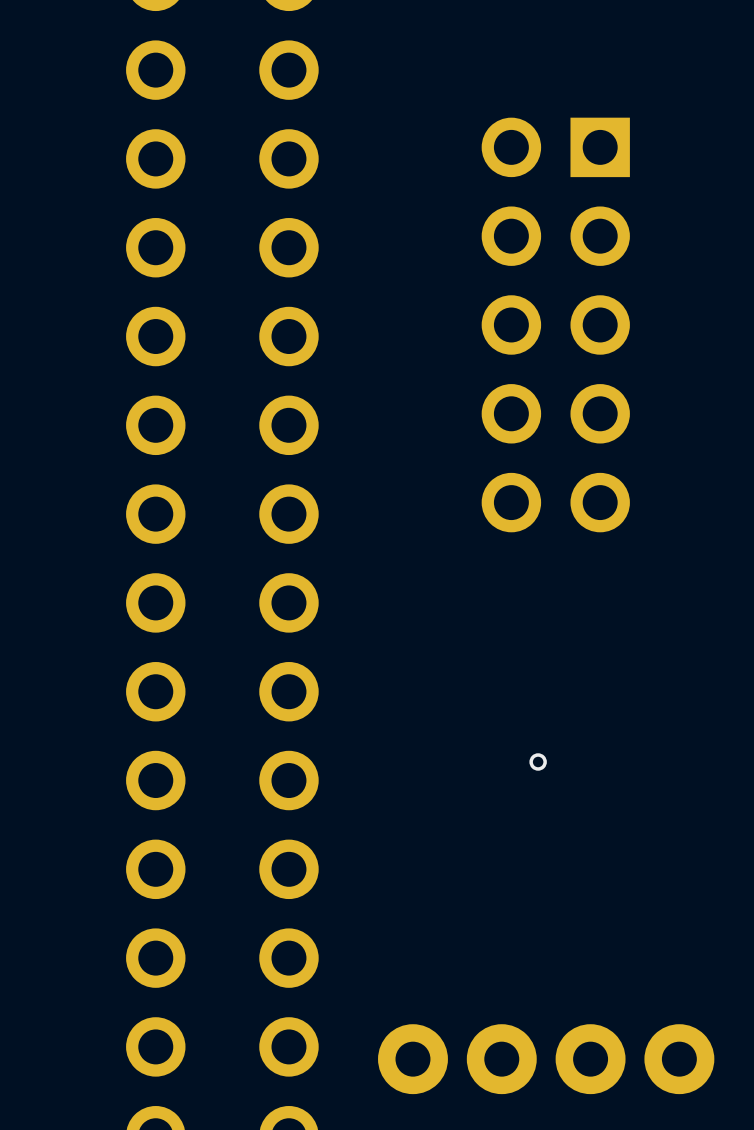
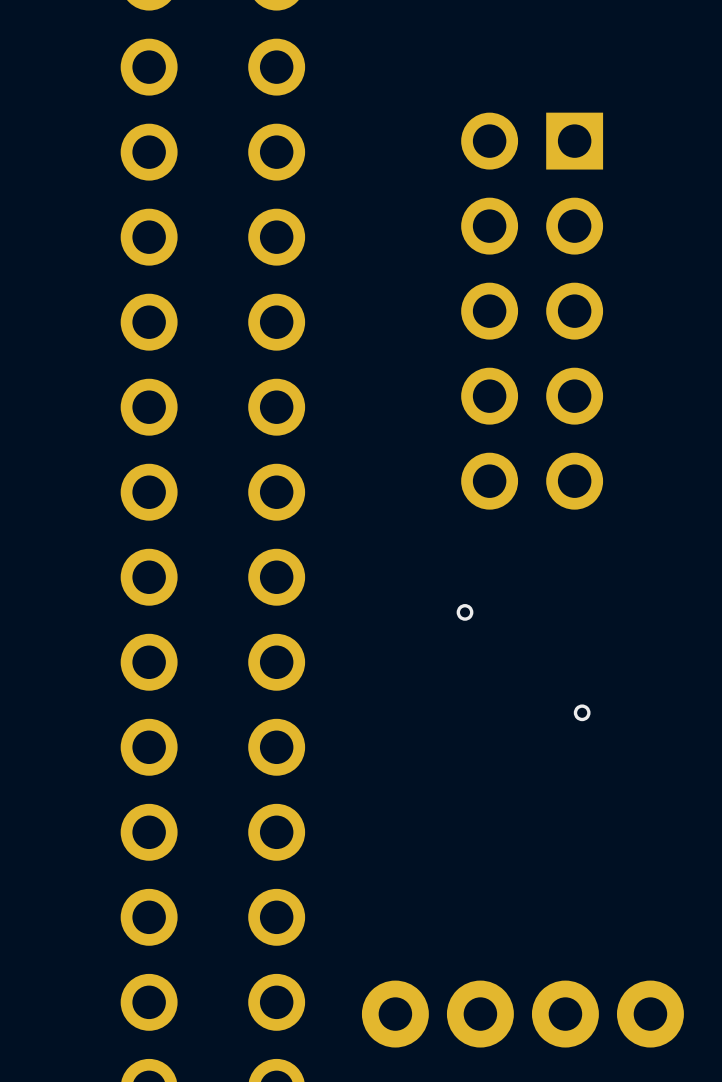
via: none -> (465, 612)
via: none -> (582, 712)
via: (538, 761) -> none

